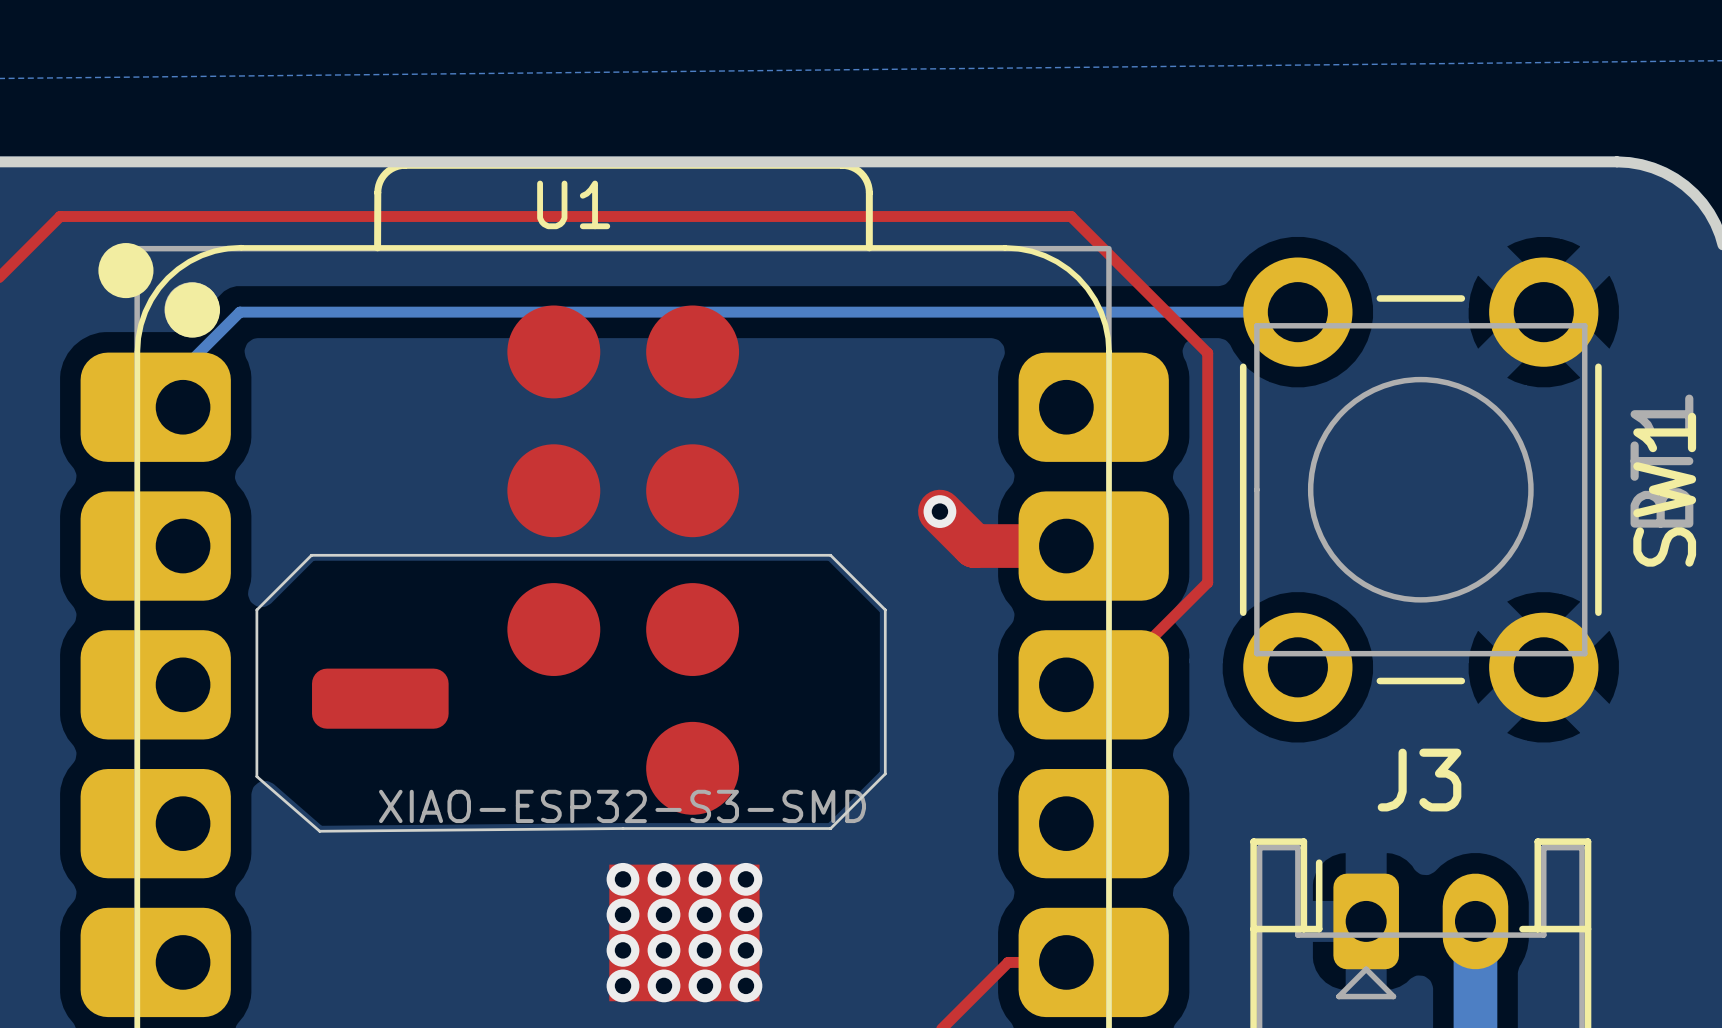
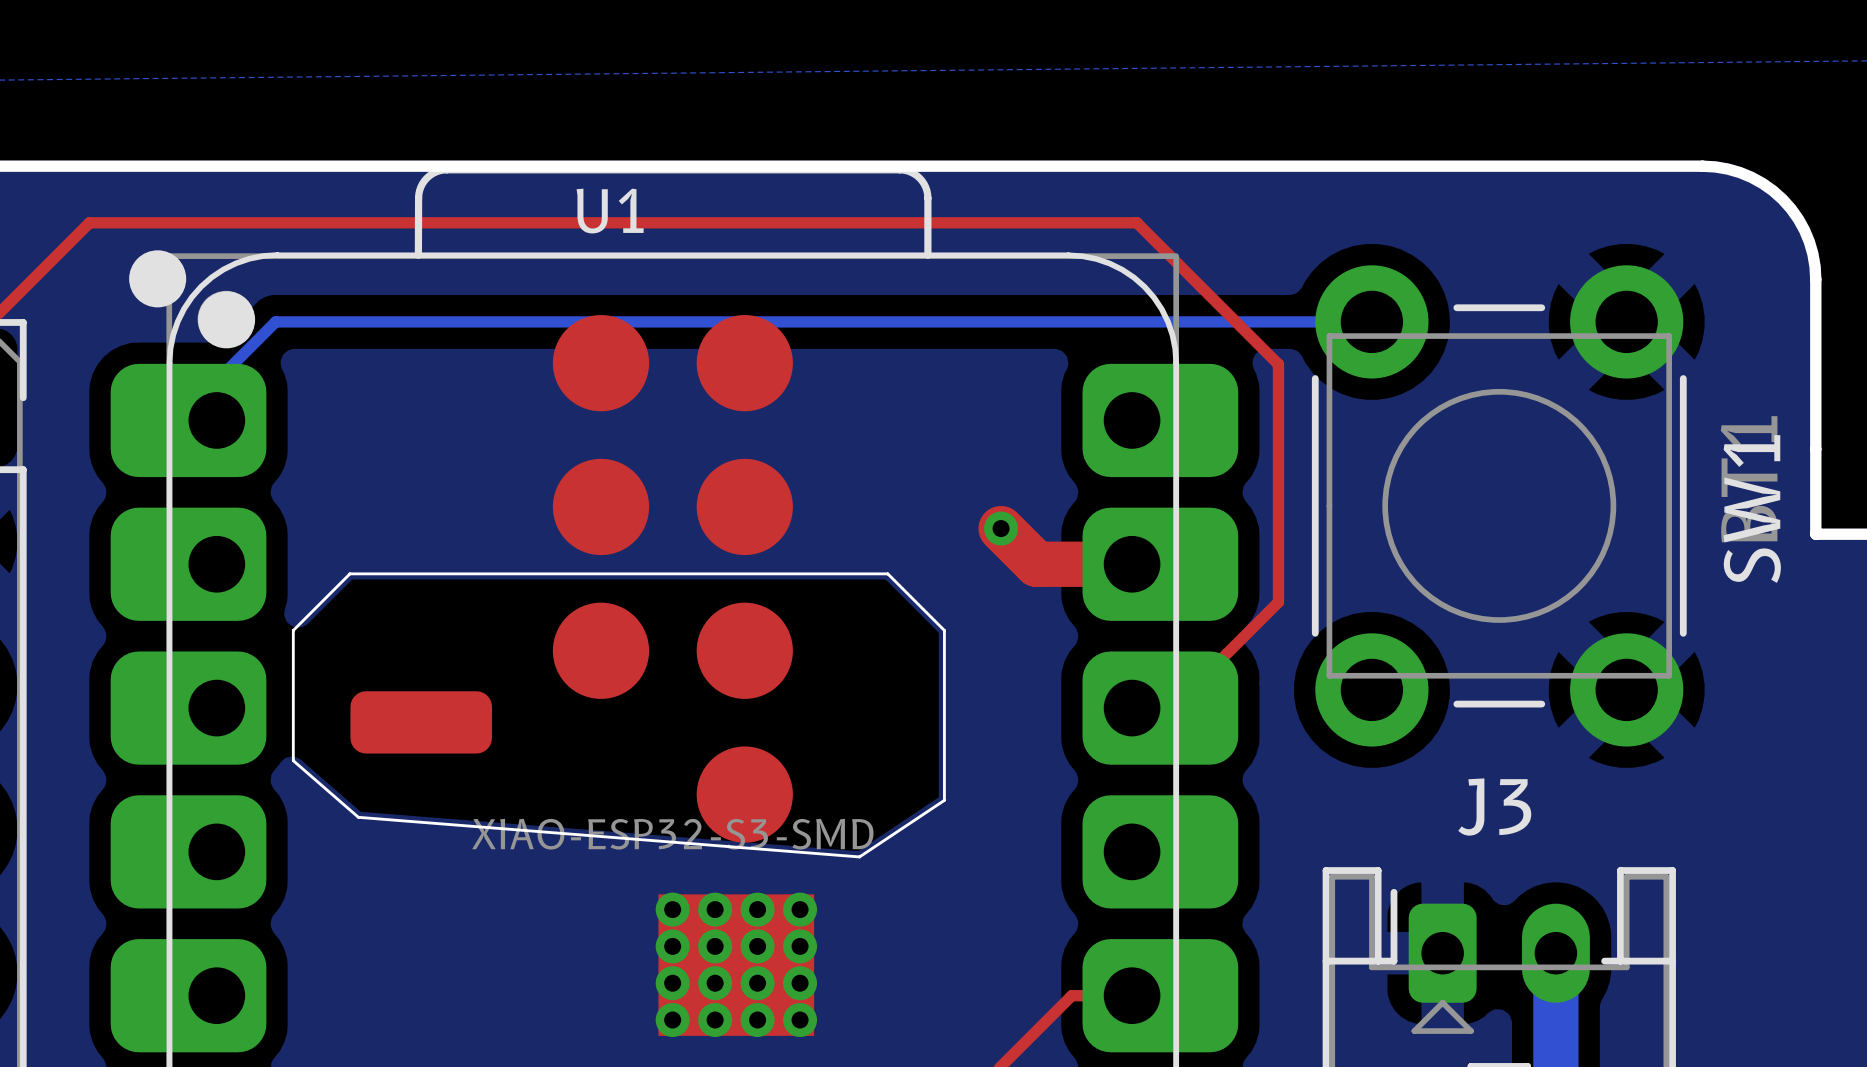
board edge: (256, 735) (256, 776) (319, 831) (830, 828) (885, 773) -> (293, 760) (358, 817) (859, 856) (944, 800)

